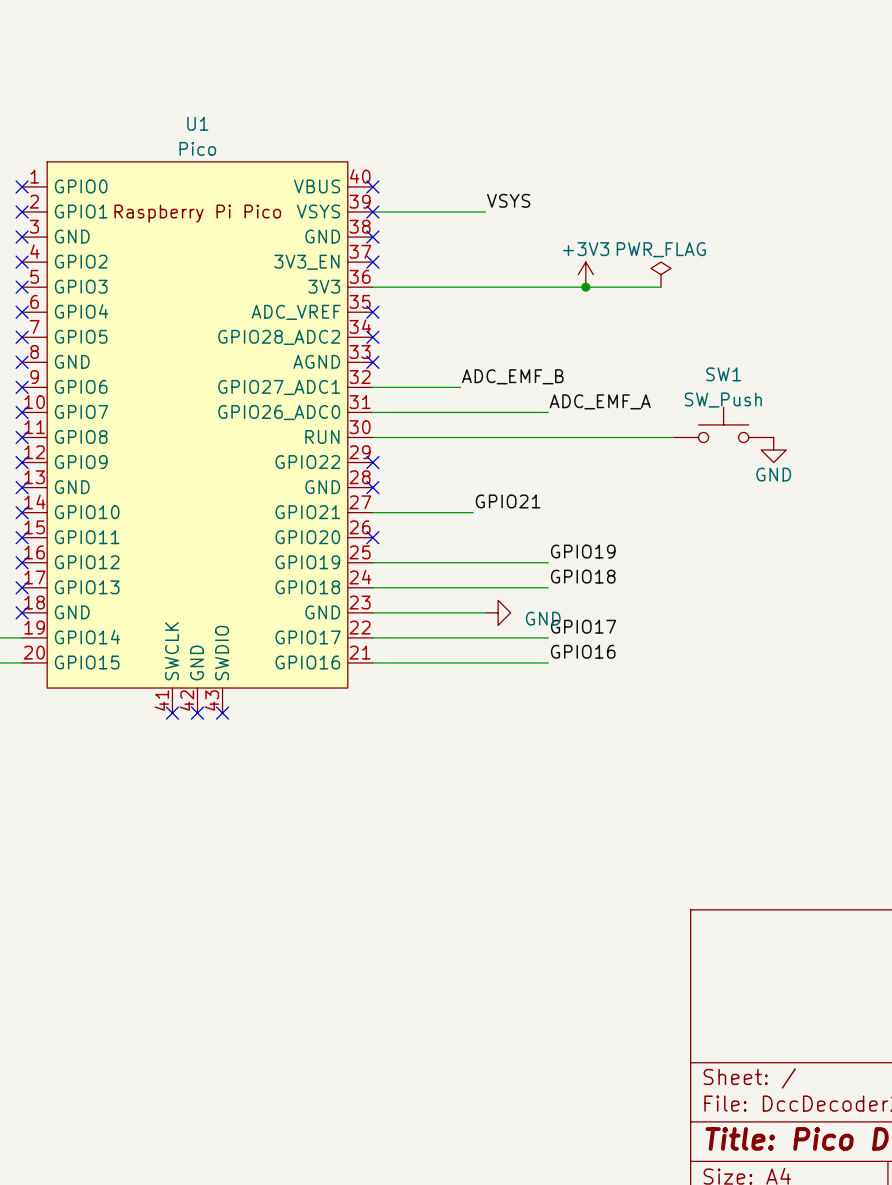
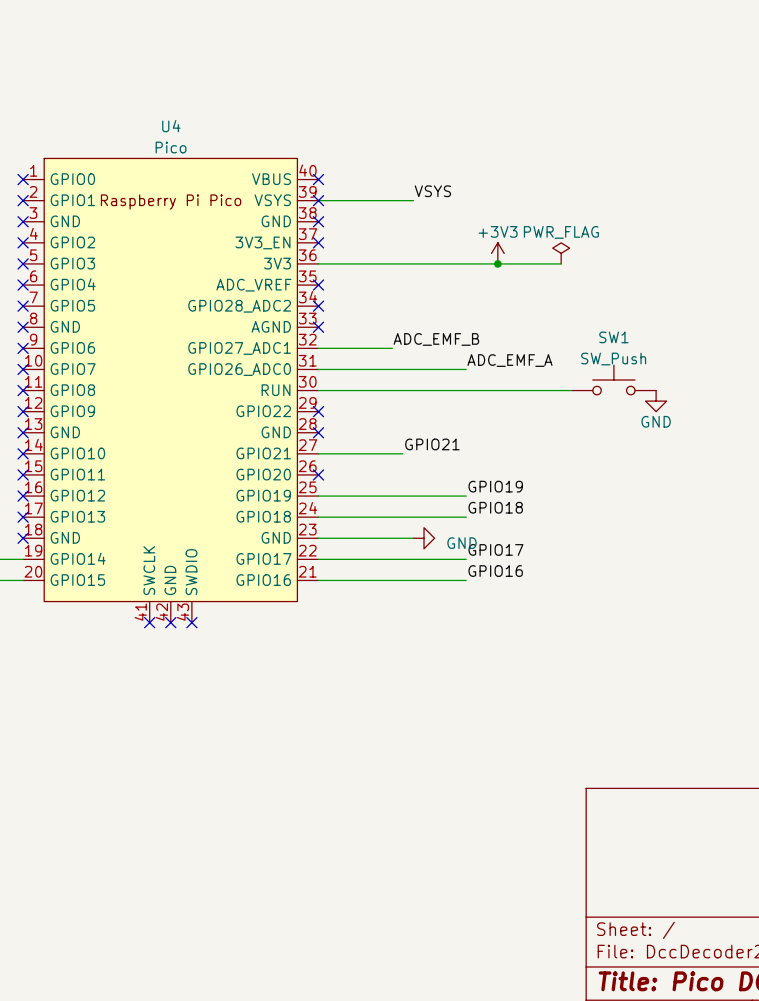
U1 name: U1 (197, 123) -> U4 (171, 126)

